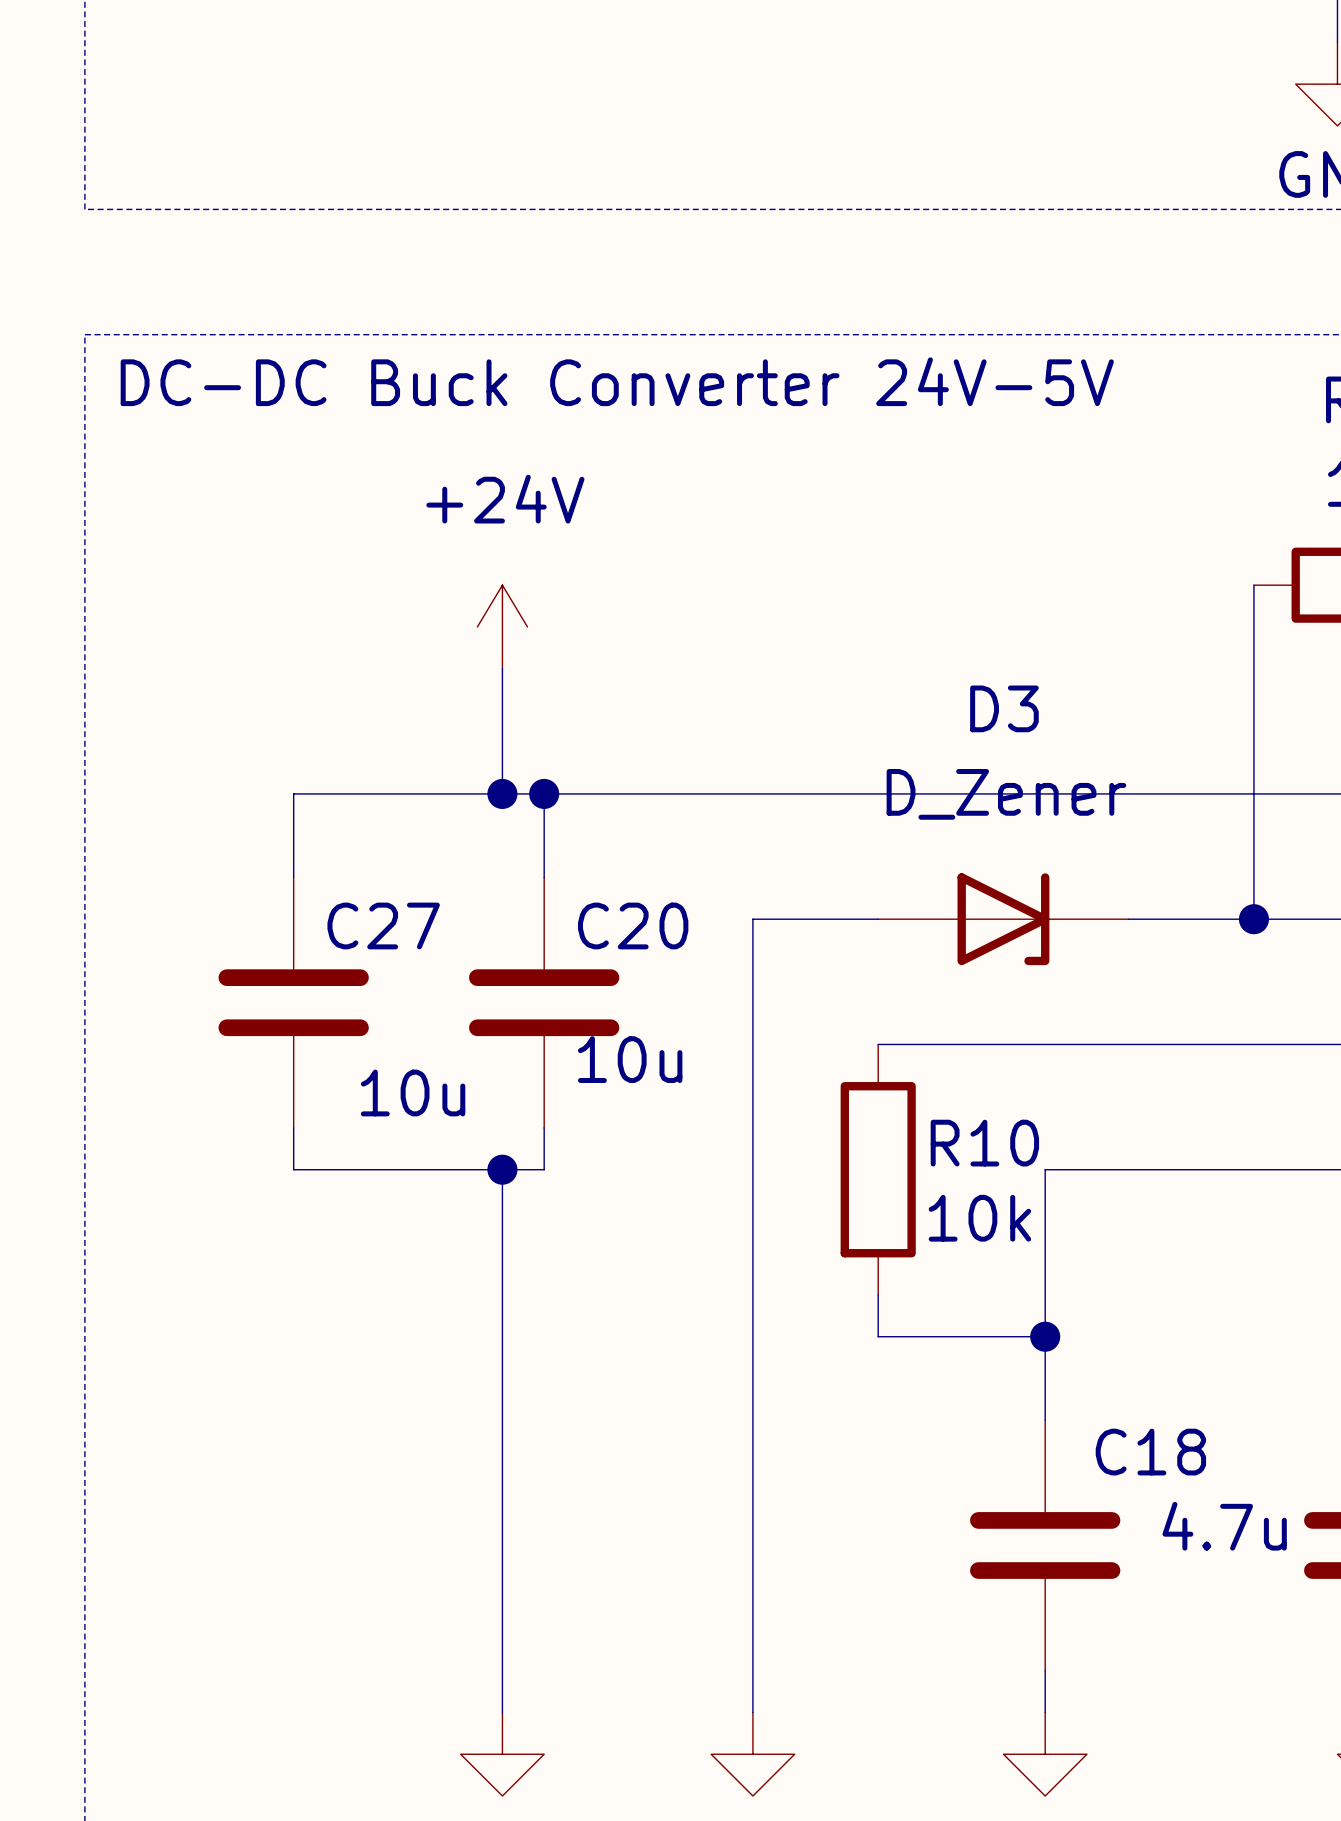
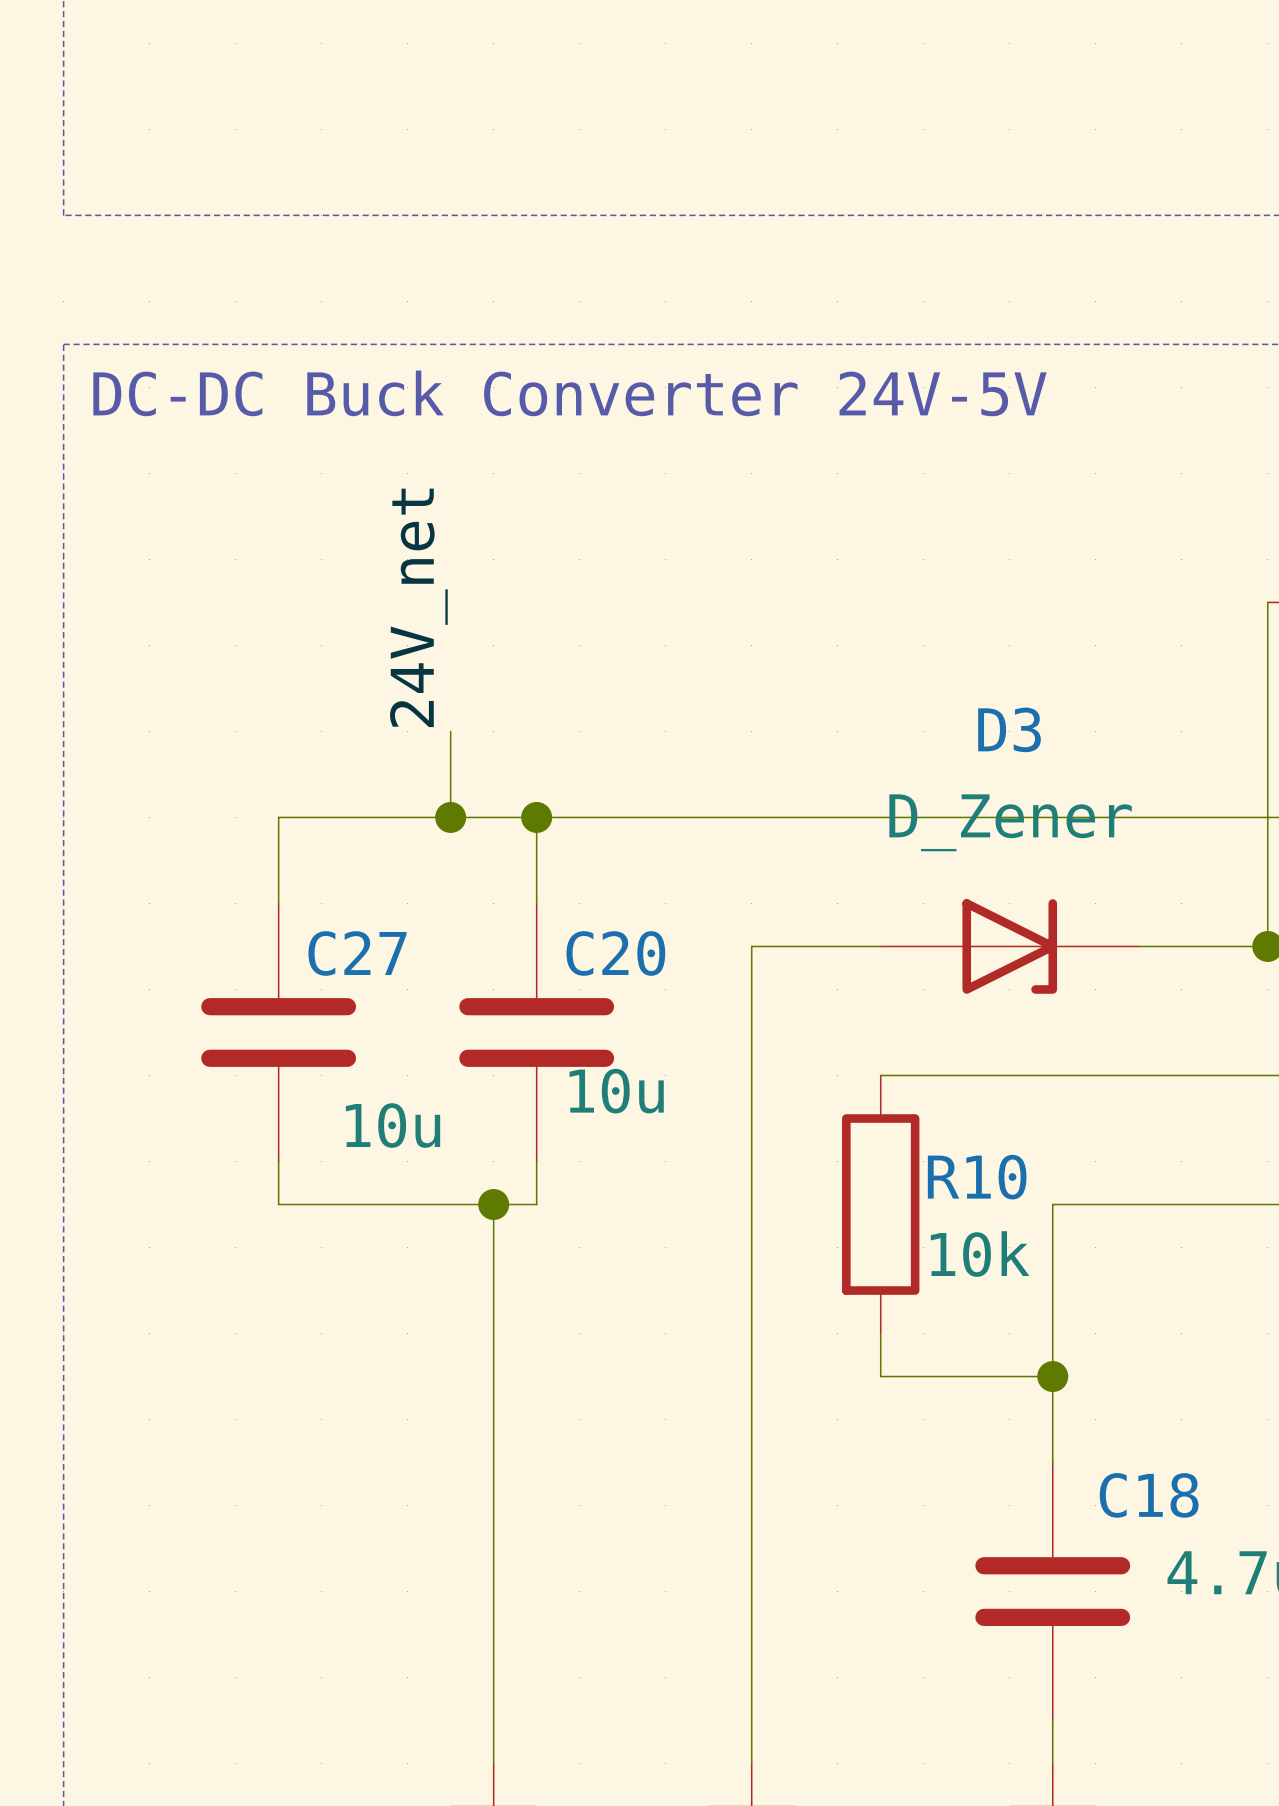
label: none -> 24V_net (418, 607)
power symbol: +24V (502, 626) -> none
wire: (502, 668) (502, 793) -> none
wire: none -> (450, 731) (450, 817)
junction position: (502, 793) -> (450, 817)

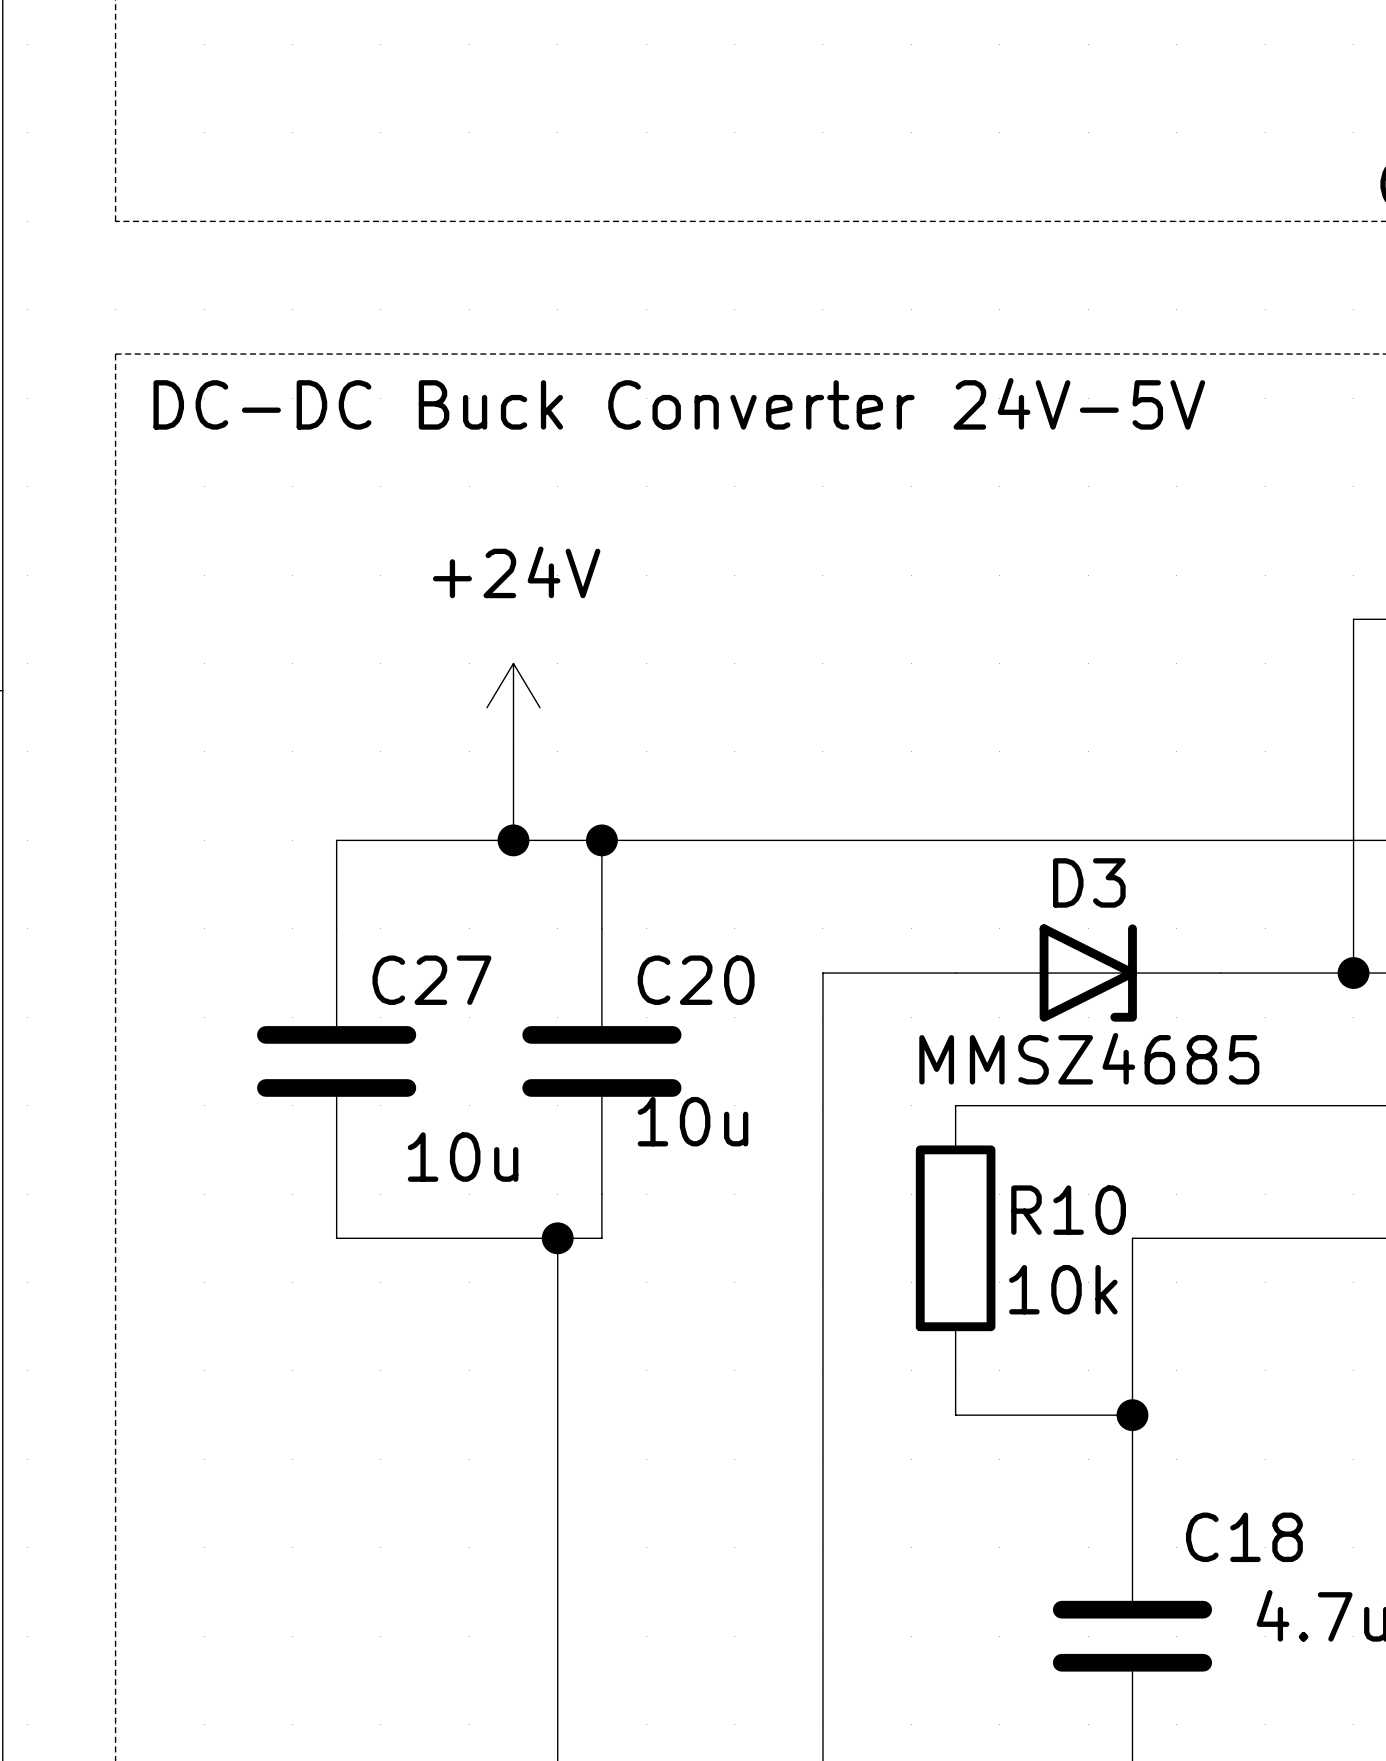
label: 24V_net (418, 607) -> none
power symbol: none -> +24V (513, 707)
D3 name position: D3 (1009, 729) -> D3 (1089, 882)
D3 value: D_Zener (1010, 822) -> MMSZ4685 (1089, 1058)

